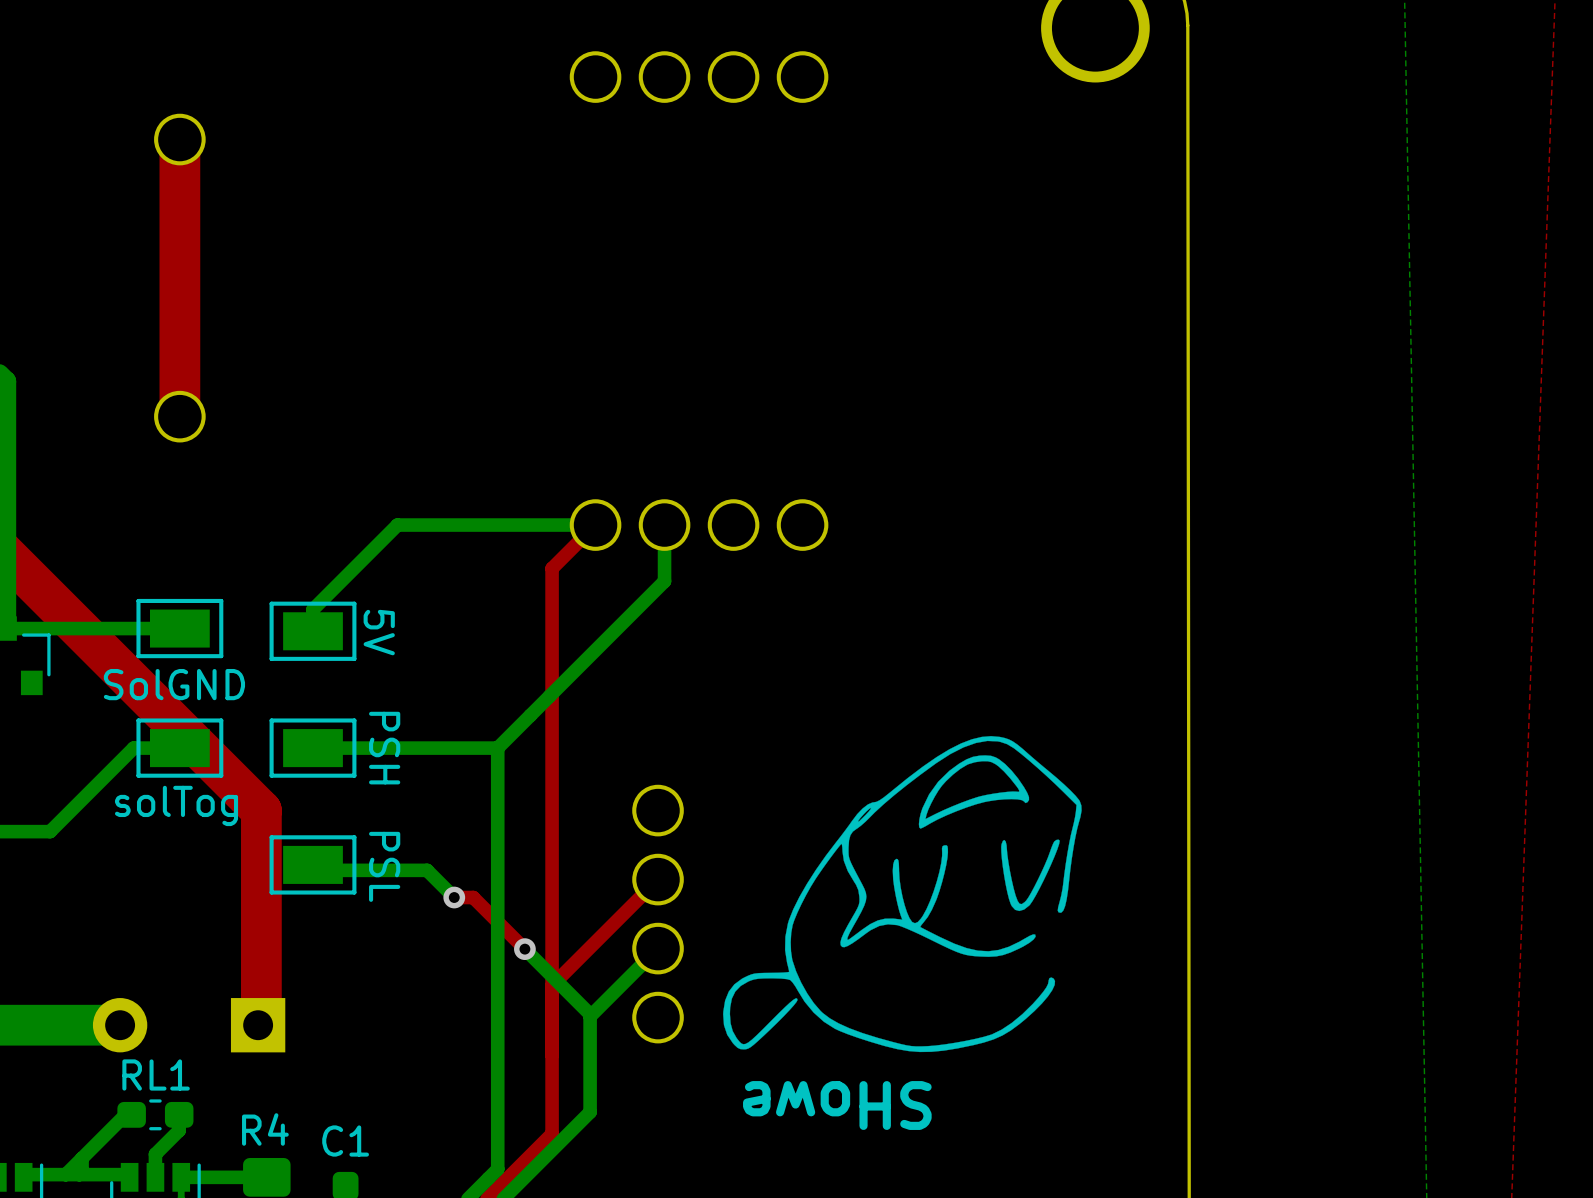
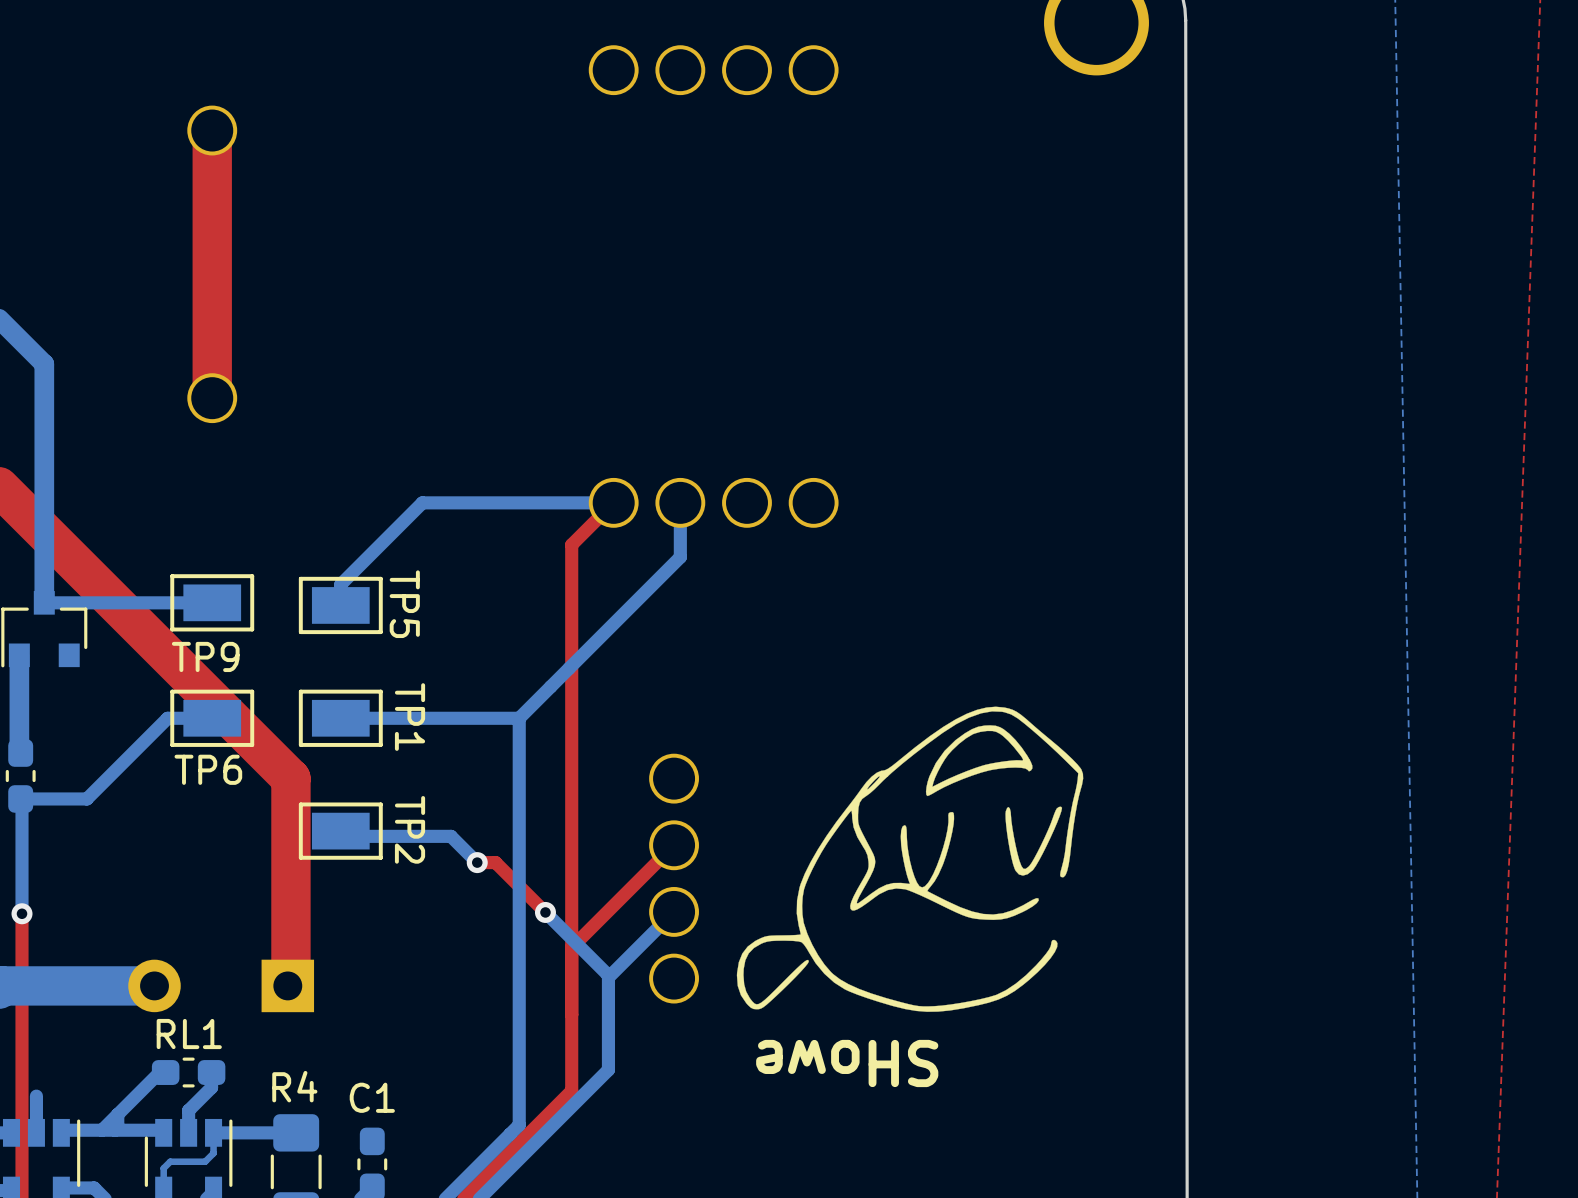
5V name: 5V (379, 632) -> TP5 (404, 604)
SolGND name: SolGND (174, 684) -> TP9 (205, 656)
PSH name: PSH (384, 748) -> TP1 (410, 717)
solTog name: solTog (176, 805) -> TP6 (208, 769)
PSL name: PSL (384, 866) -> TP2 (410, 829)

